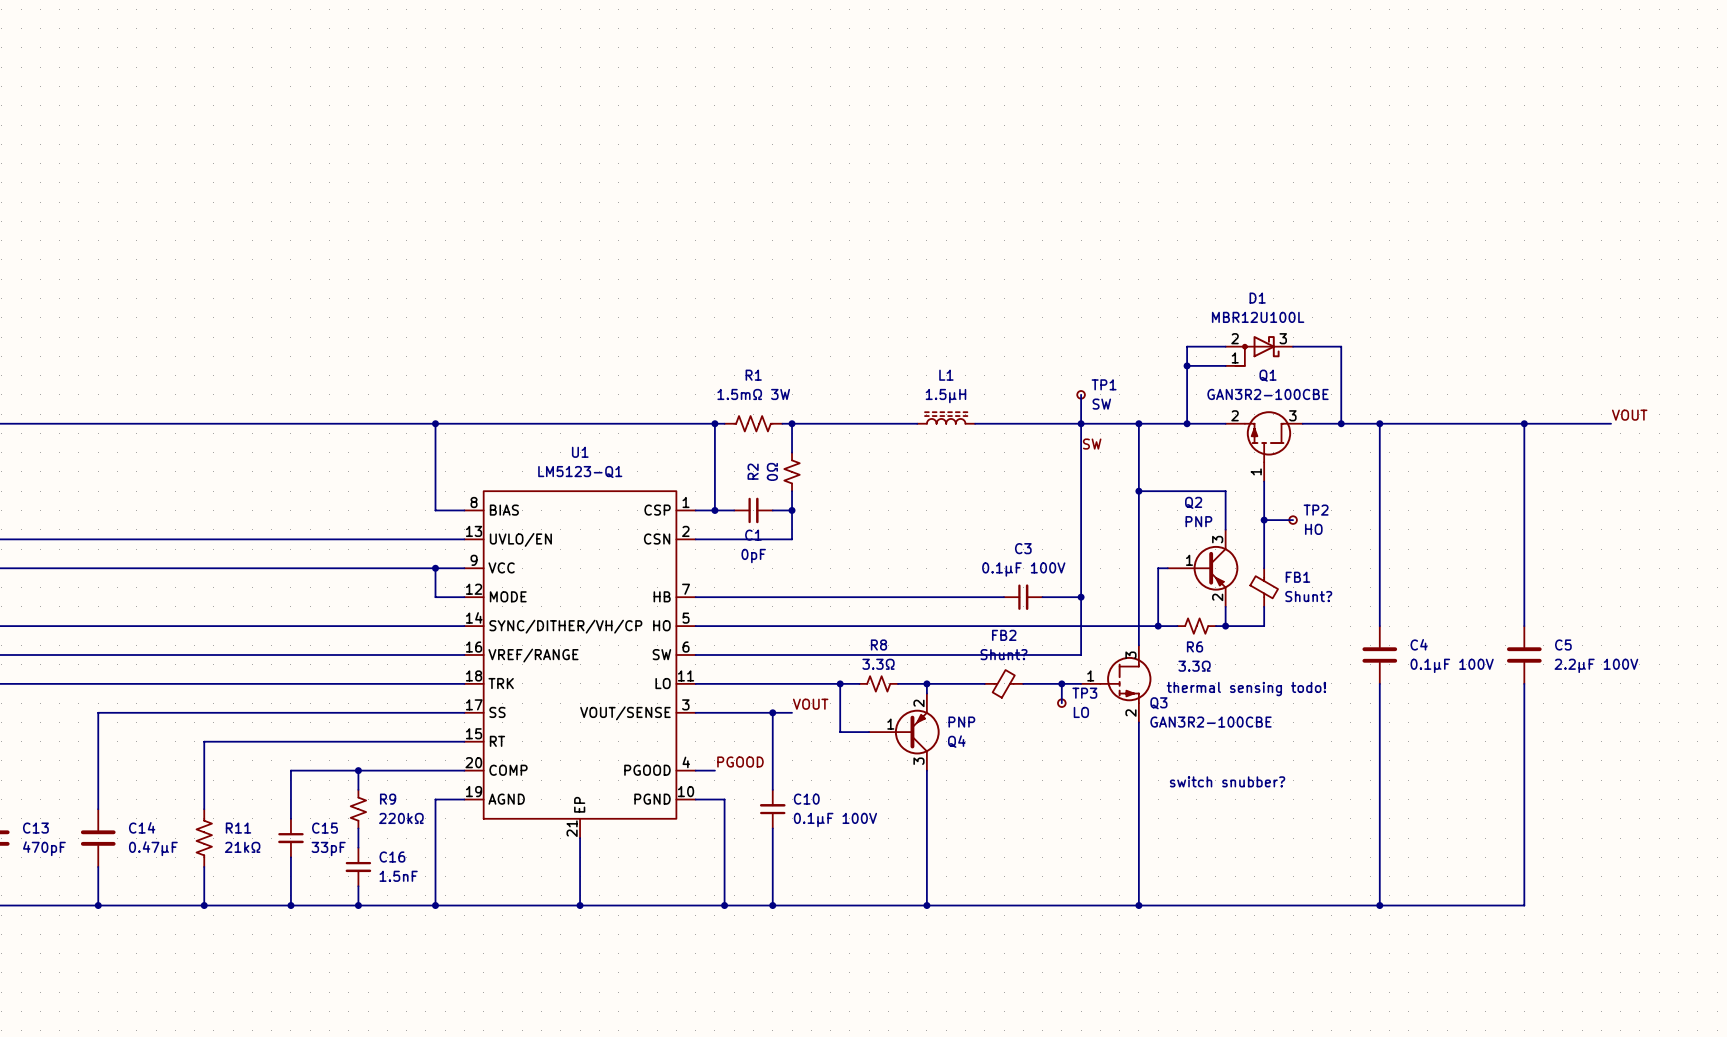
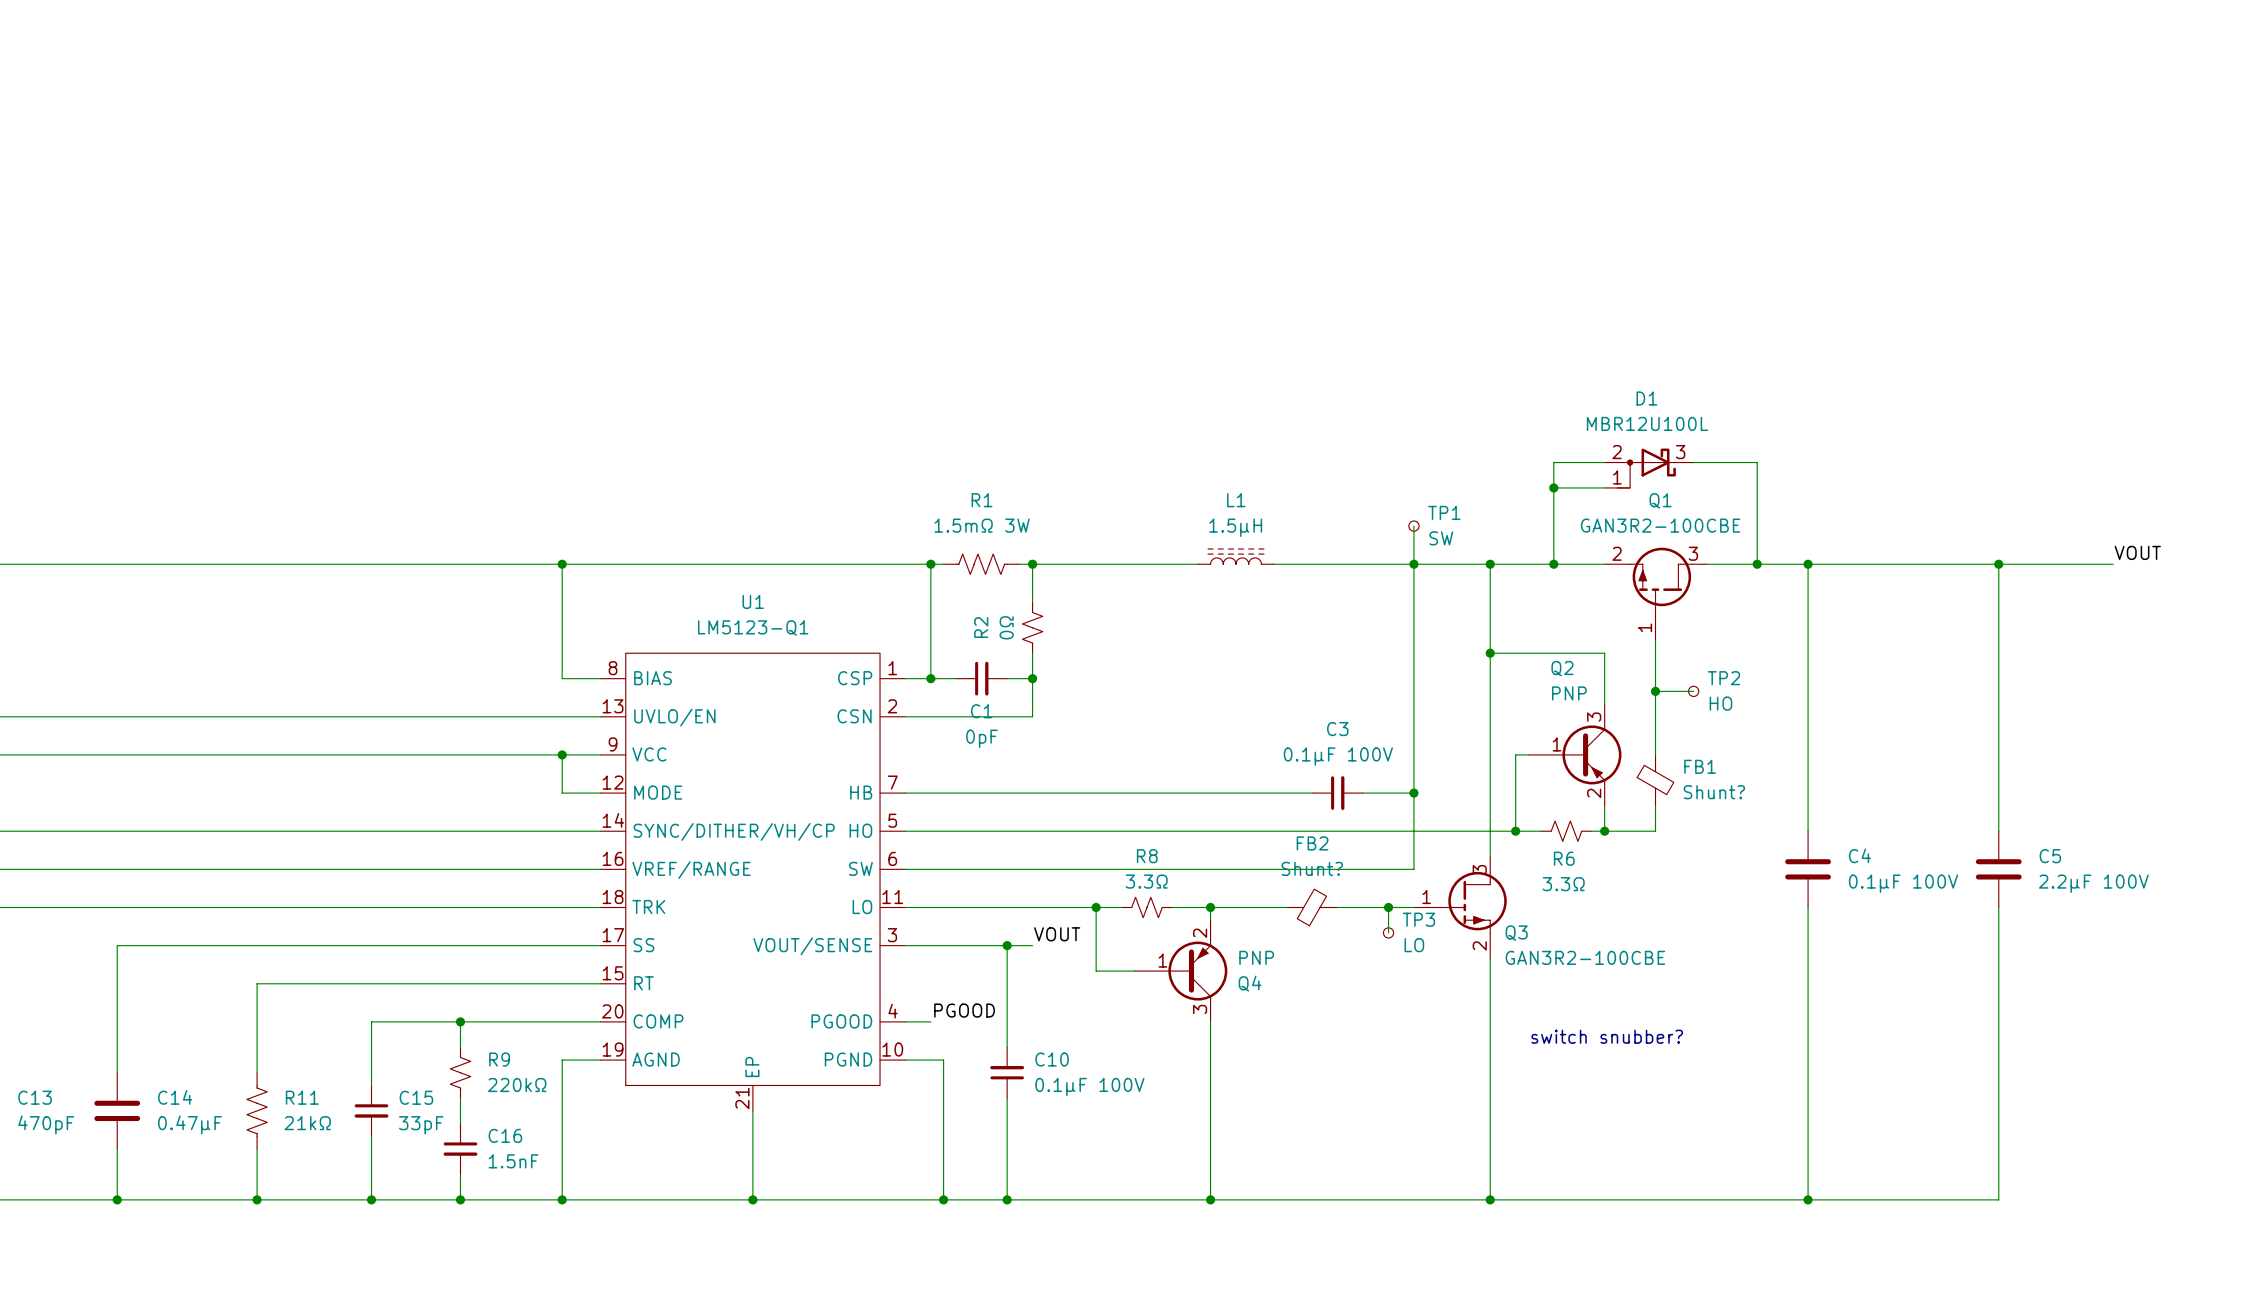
label: SW (1092, 444) -> none
text: thermal sensing todo! (1246, 689) -> none

